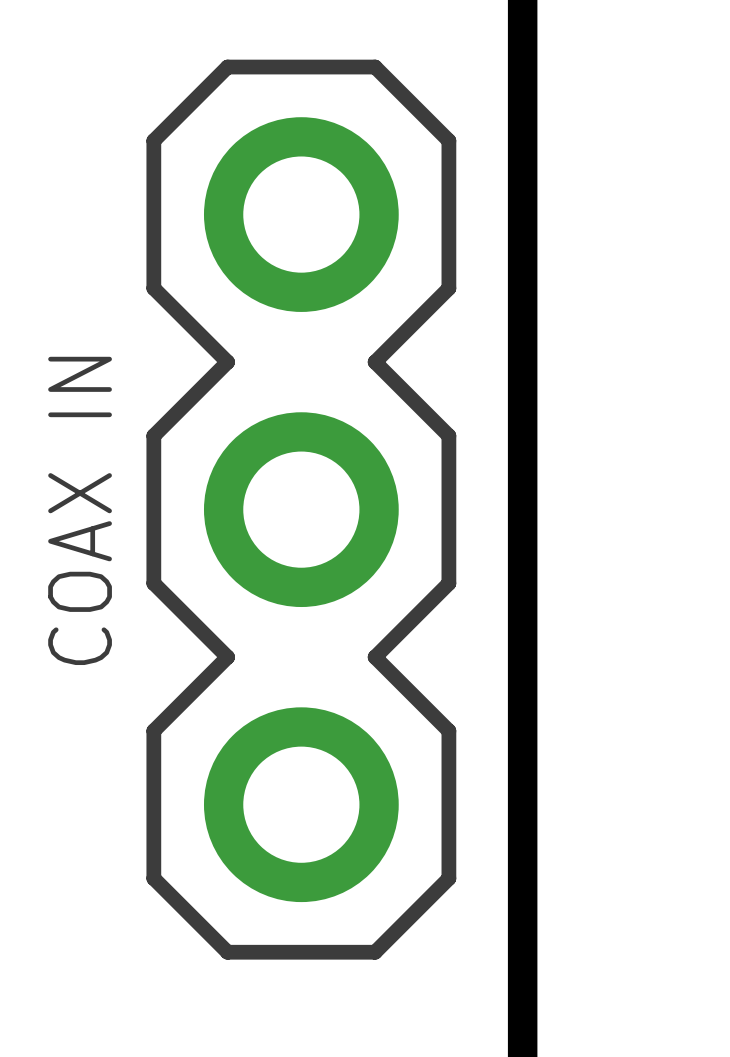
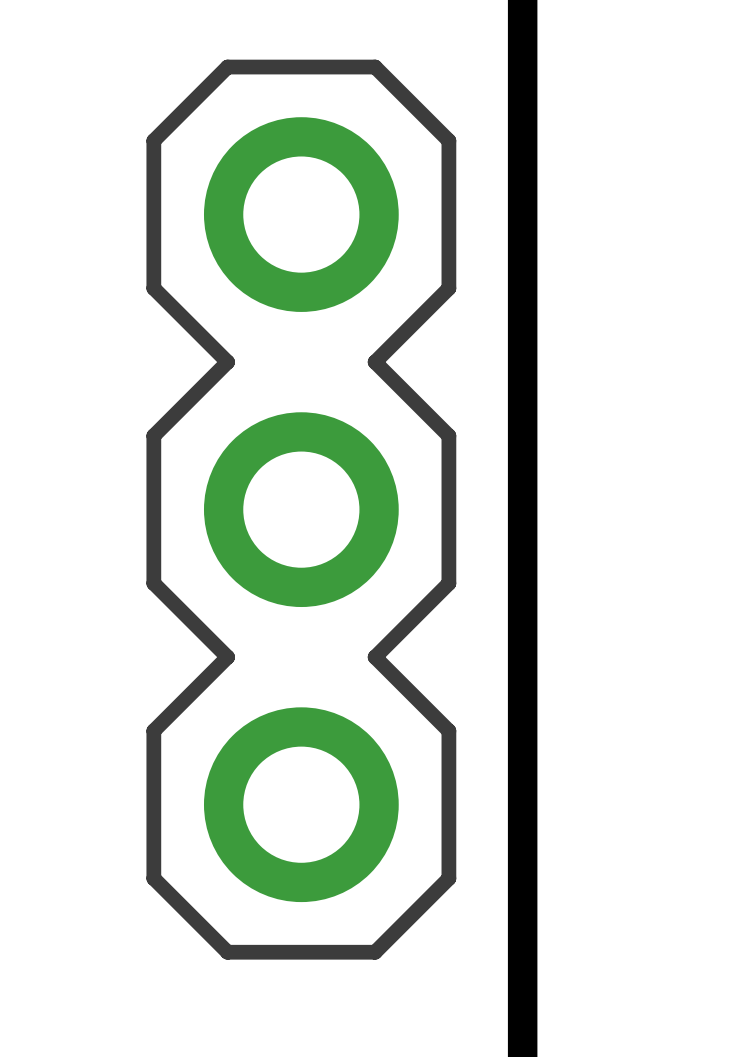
text: COAX IN (80, 510) -> none

